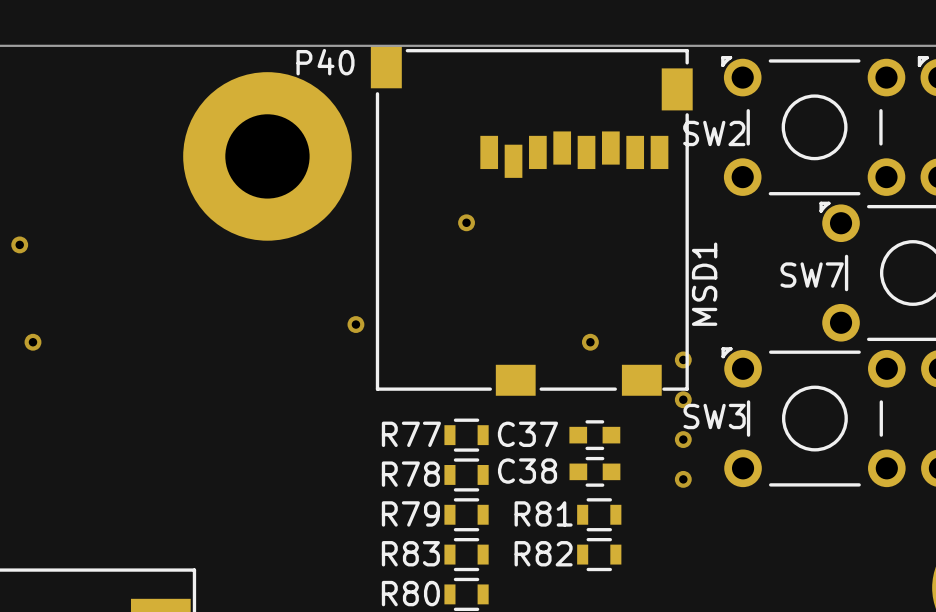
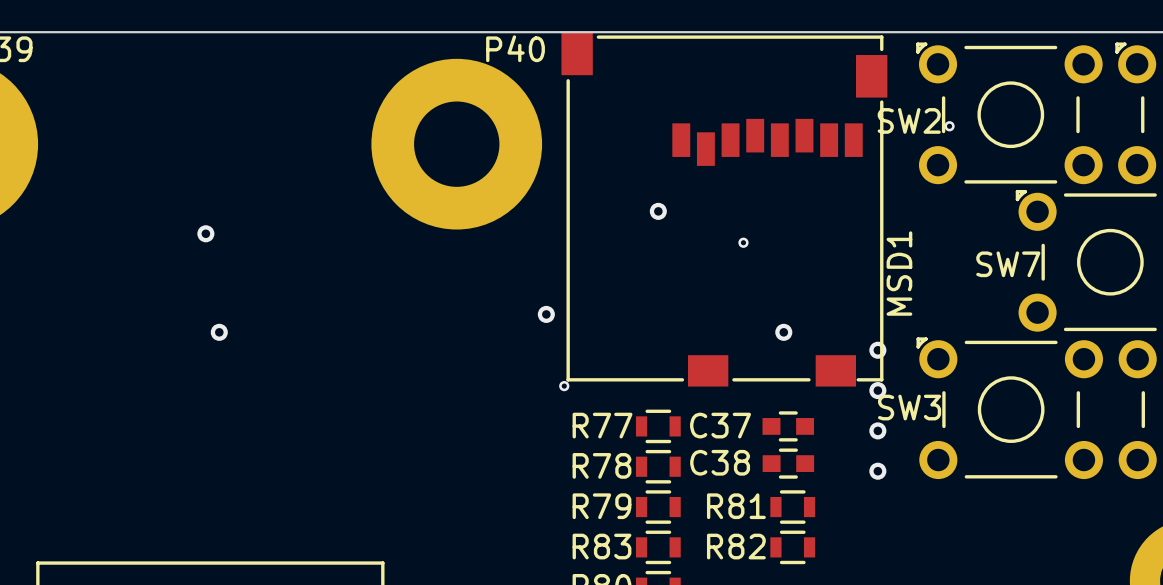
via: none -> (949, 126)
via: none -> (743, 242)
via: none -> (564, 386)

